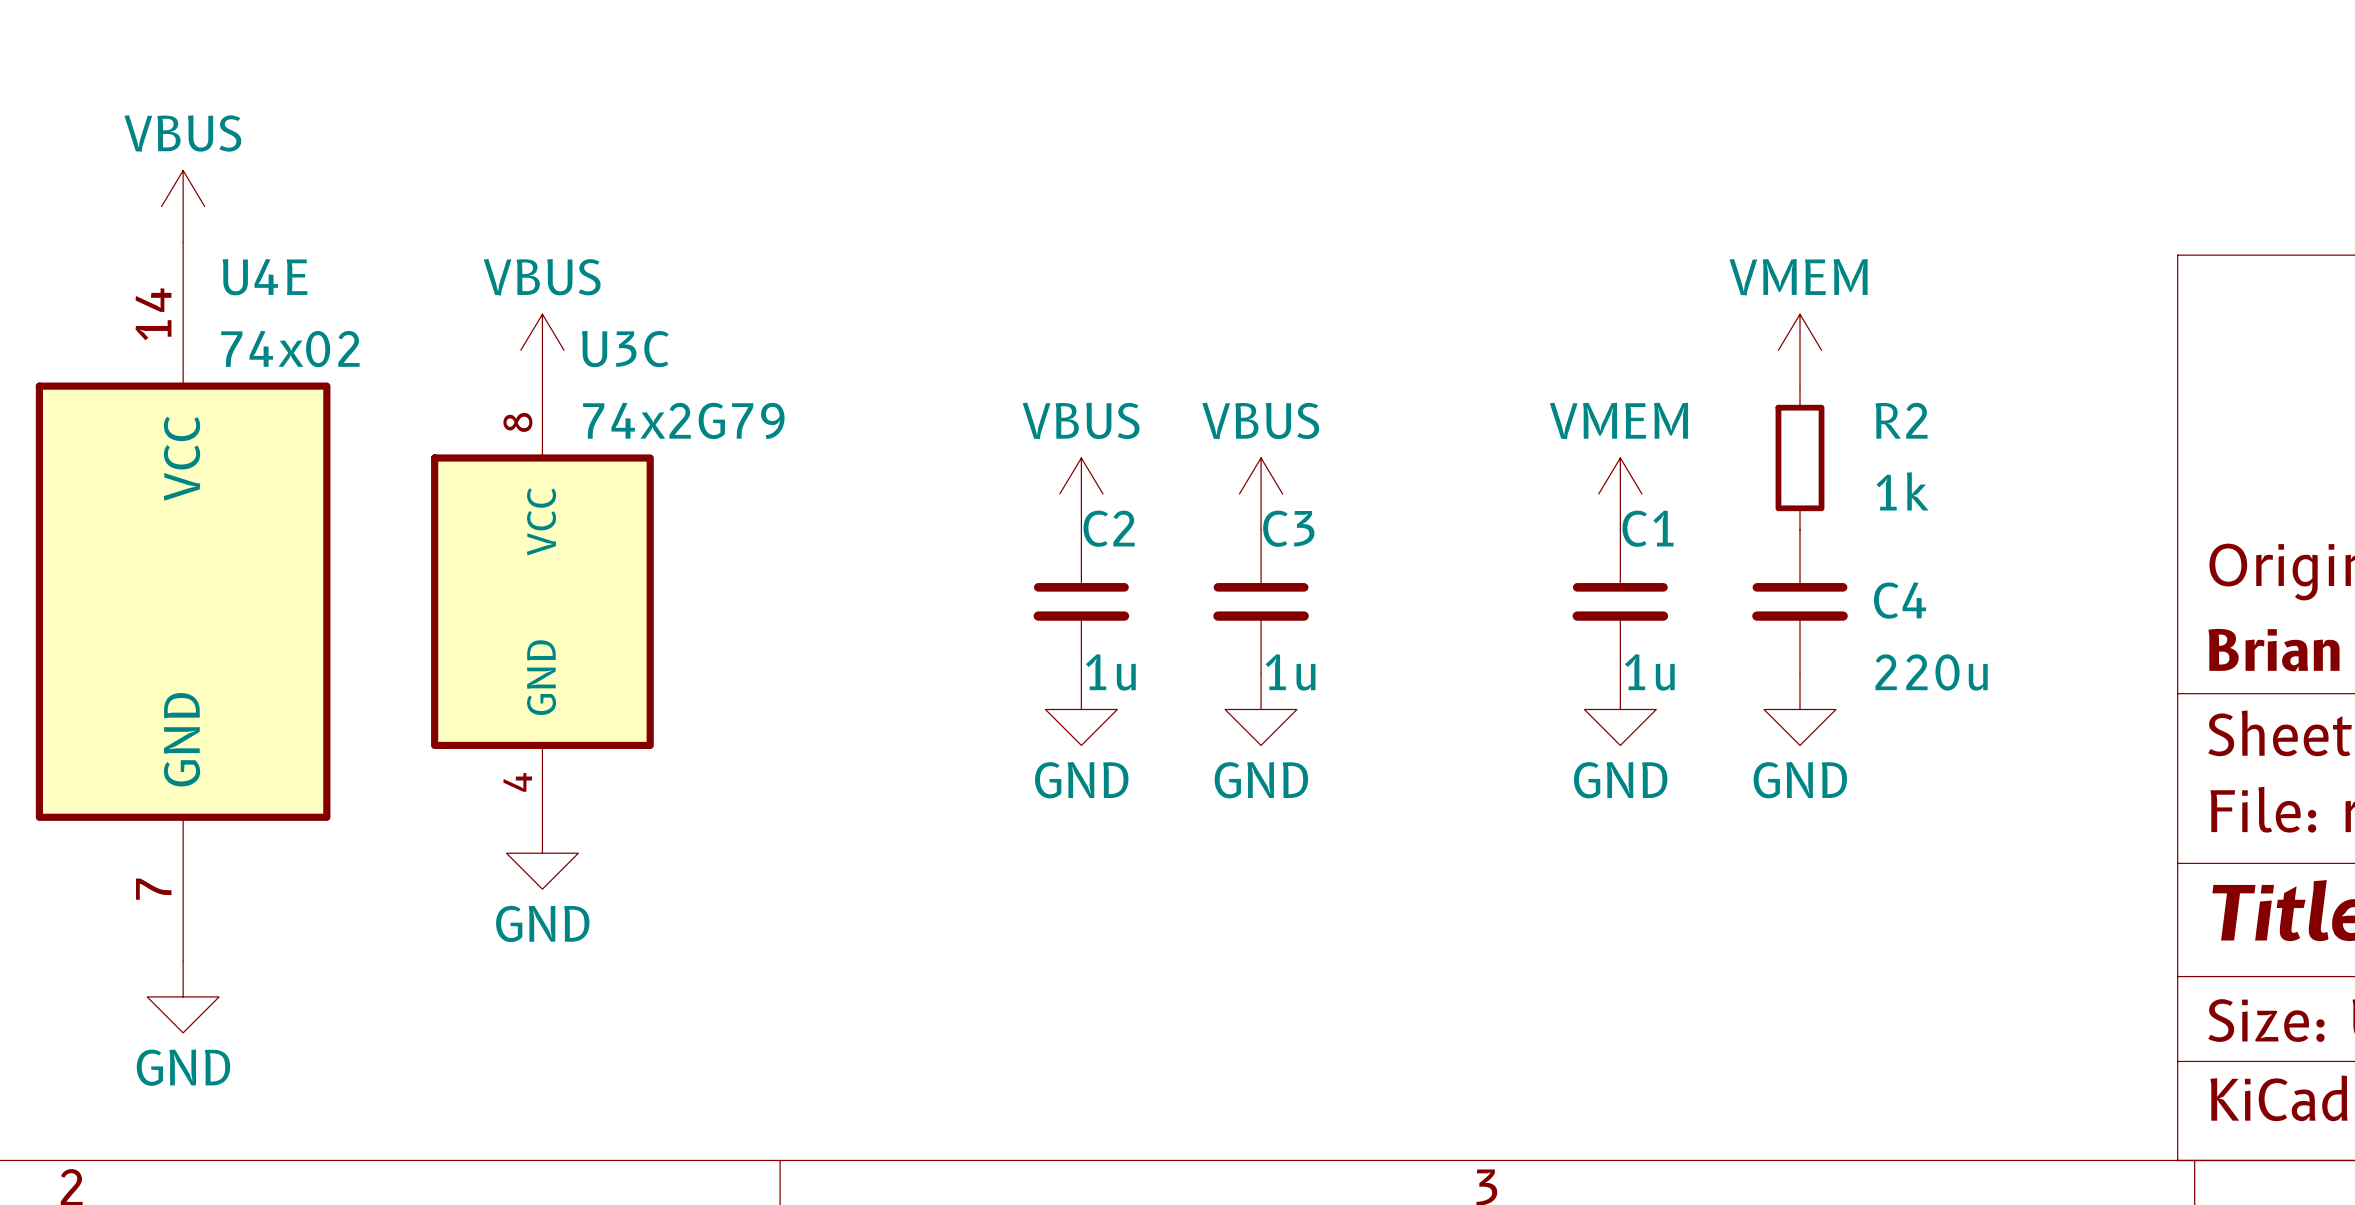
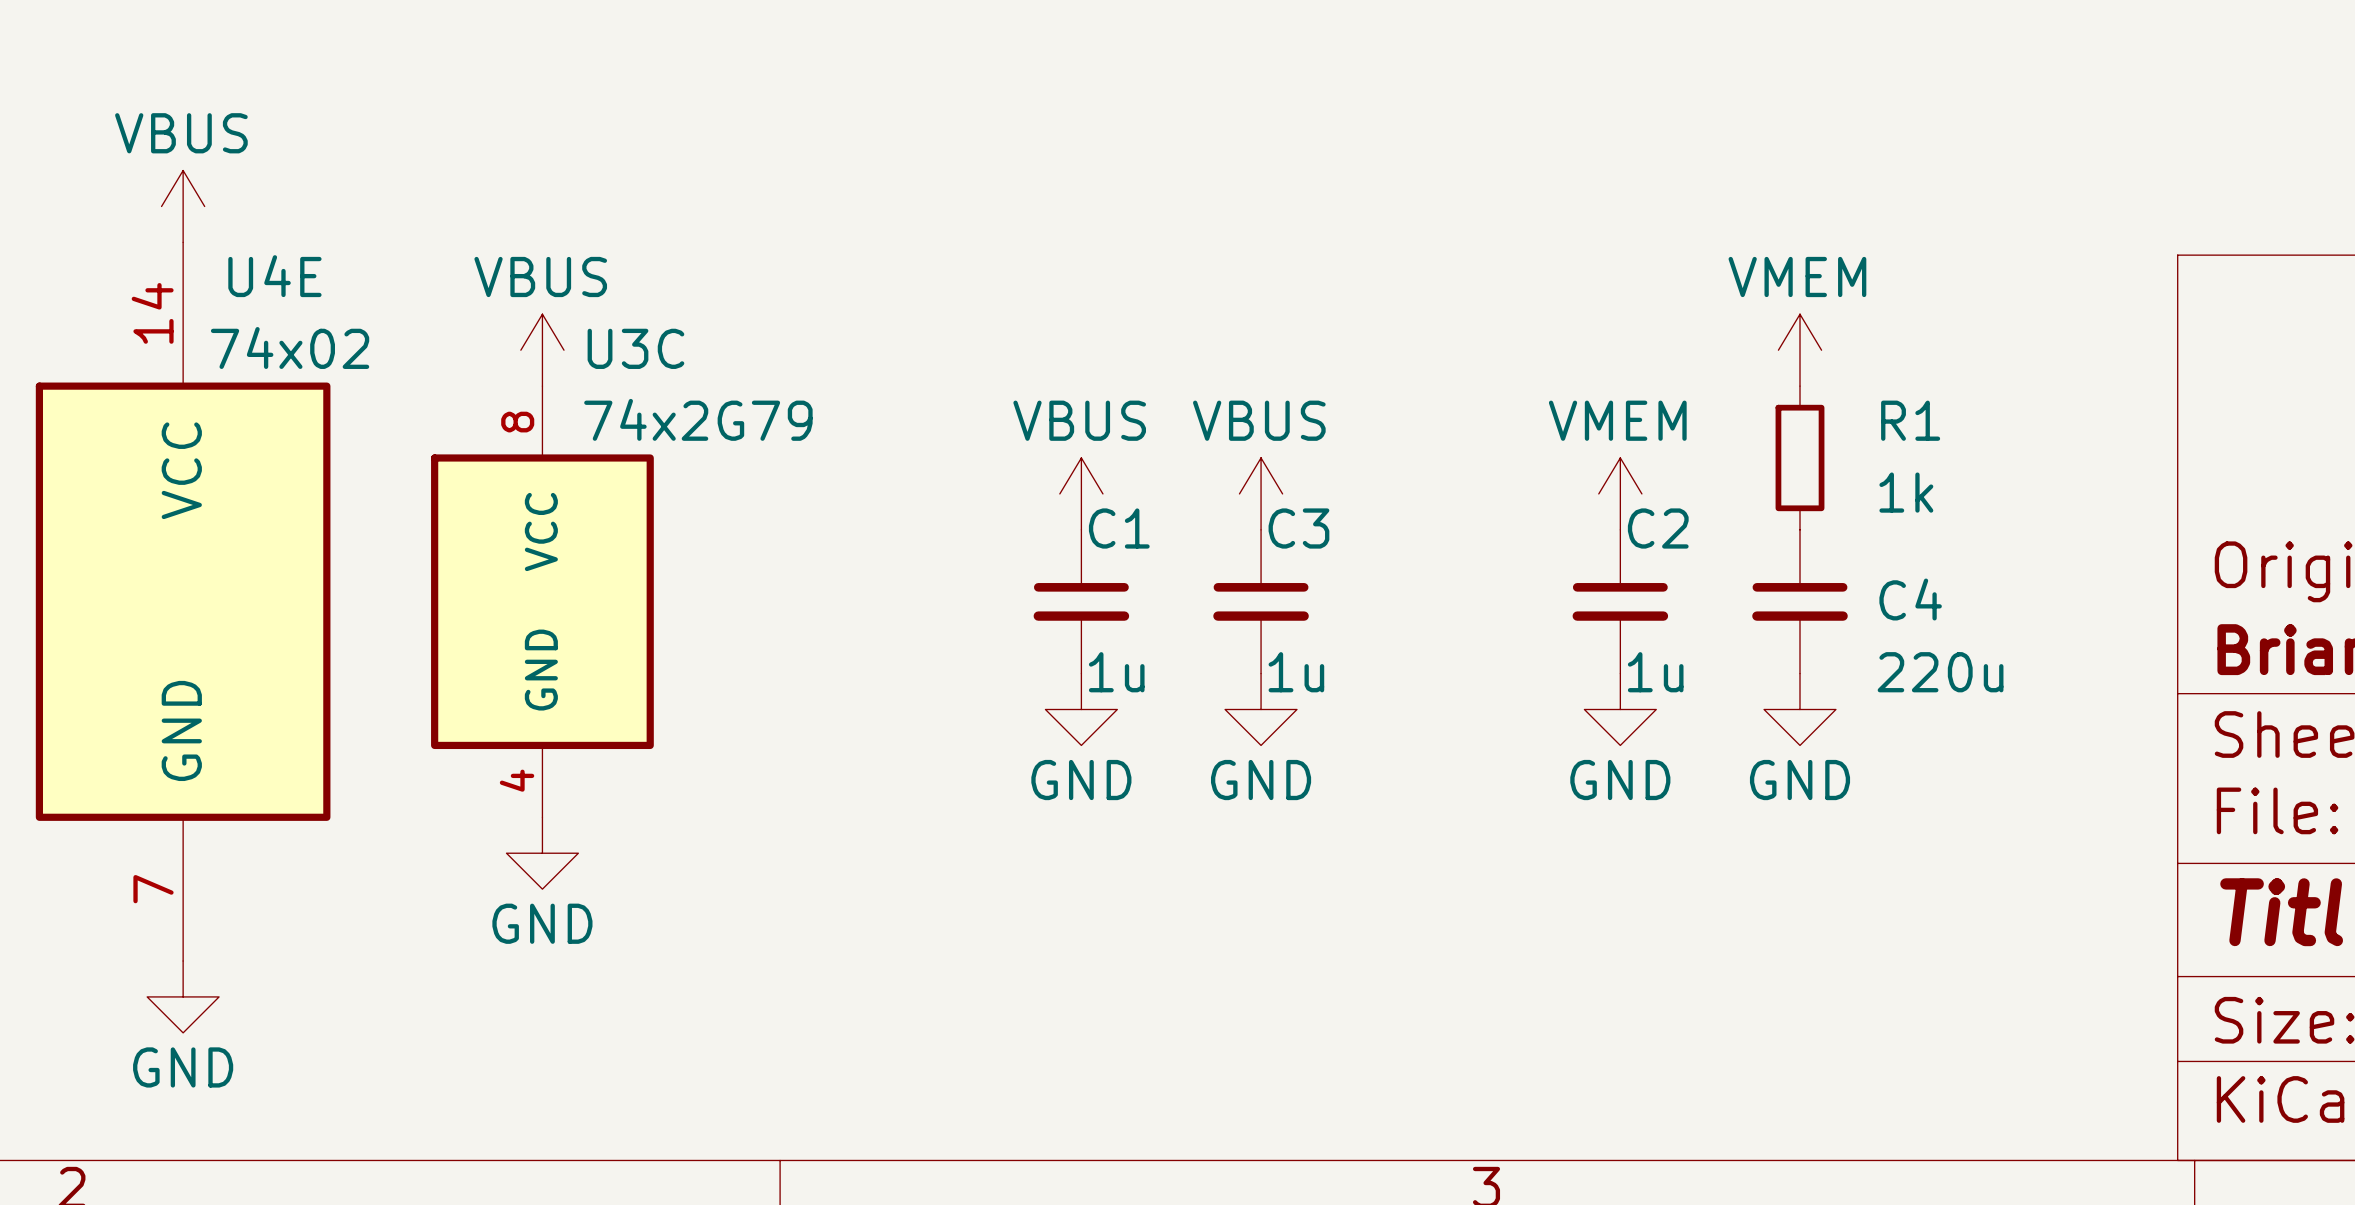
R2 name: R2 (1901, 420) -> R1 (1910, 420)
C2 name: C2 (1109, 528) -> C1 (1119, 528)
C1 name: C1 (1647, 528) -> C2 (1658, 528)

